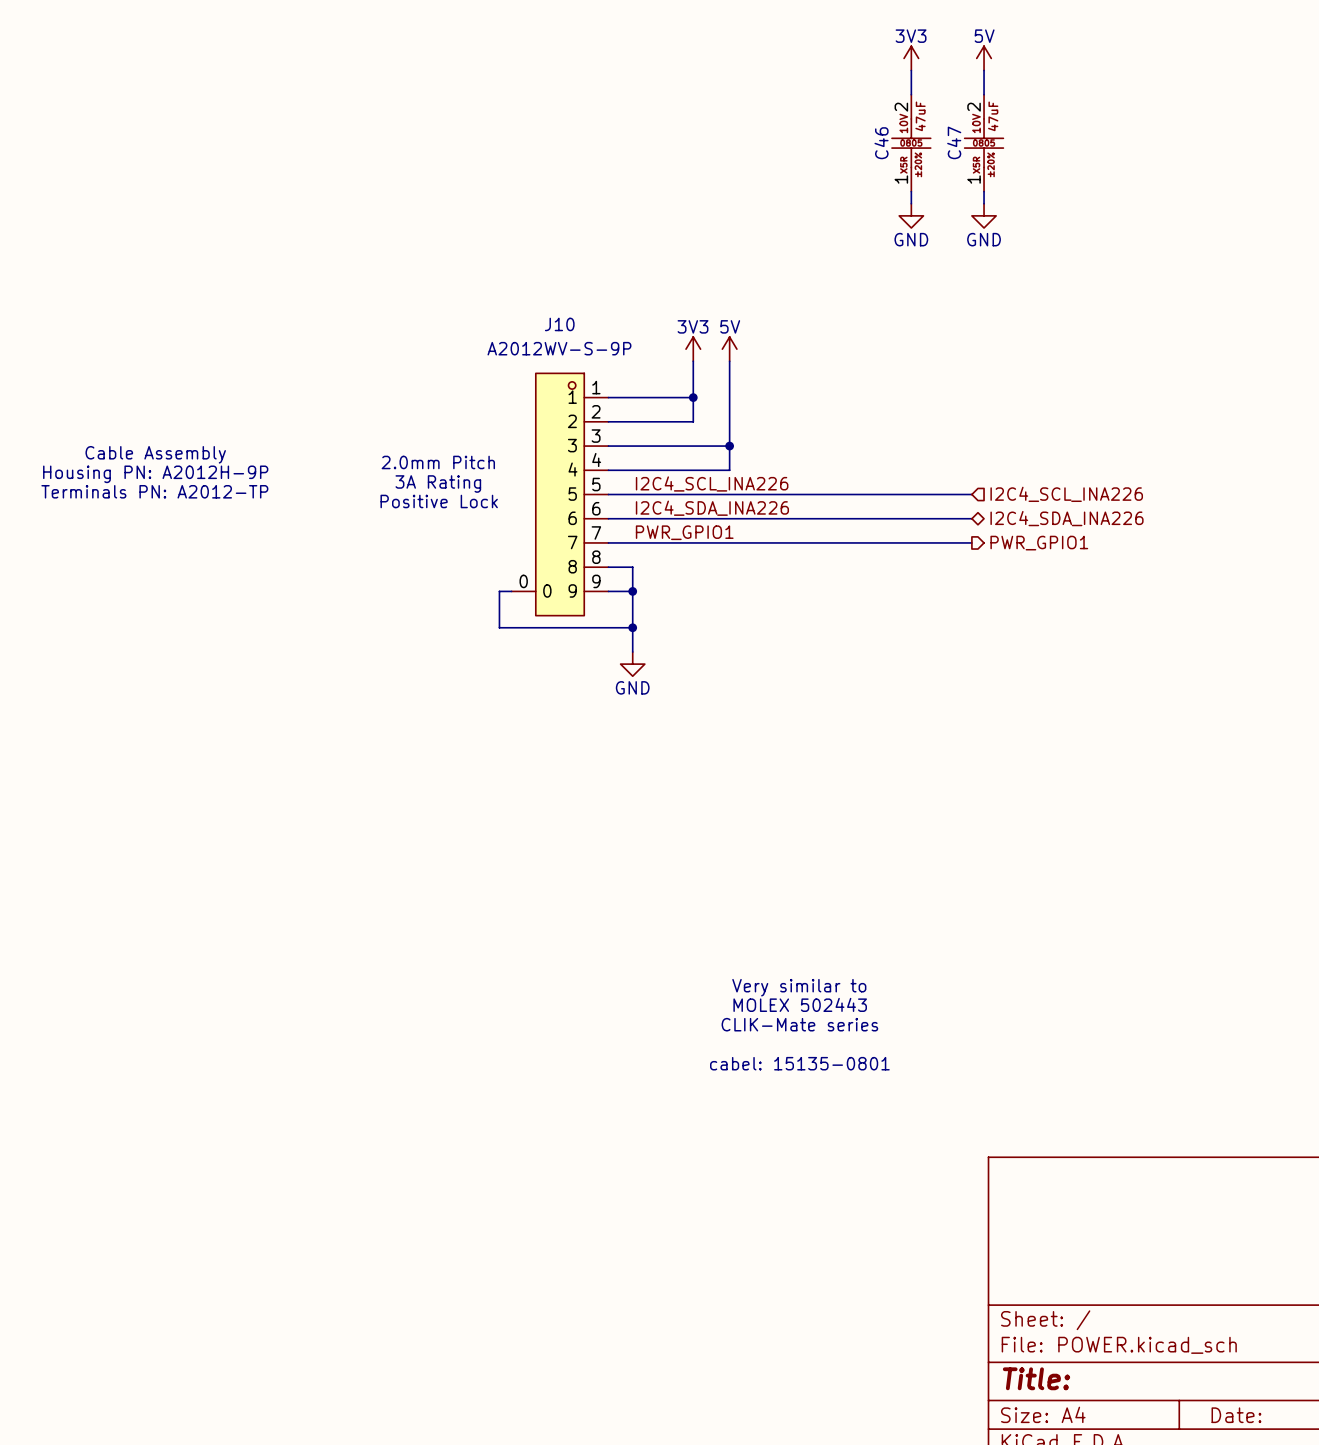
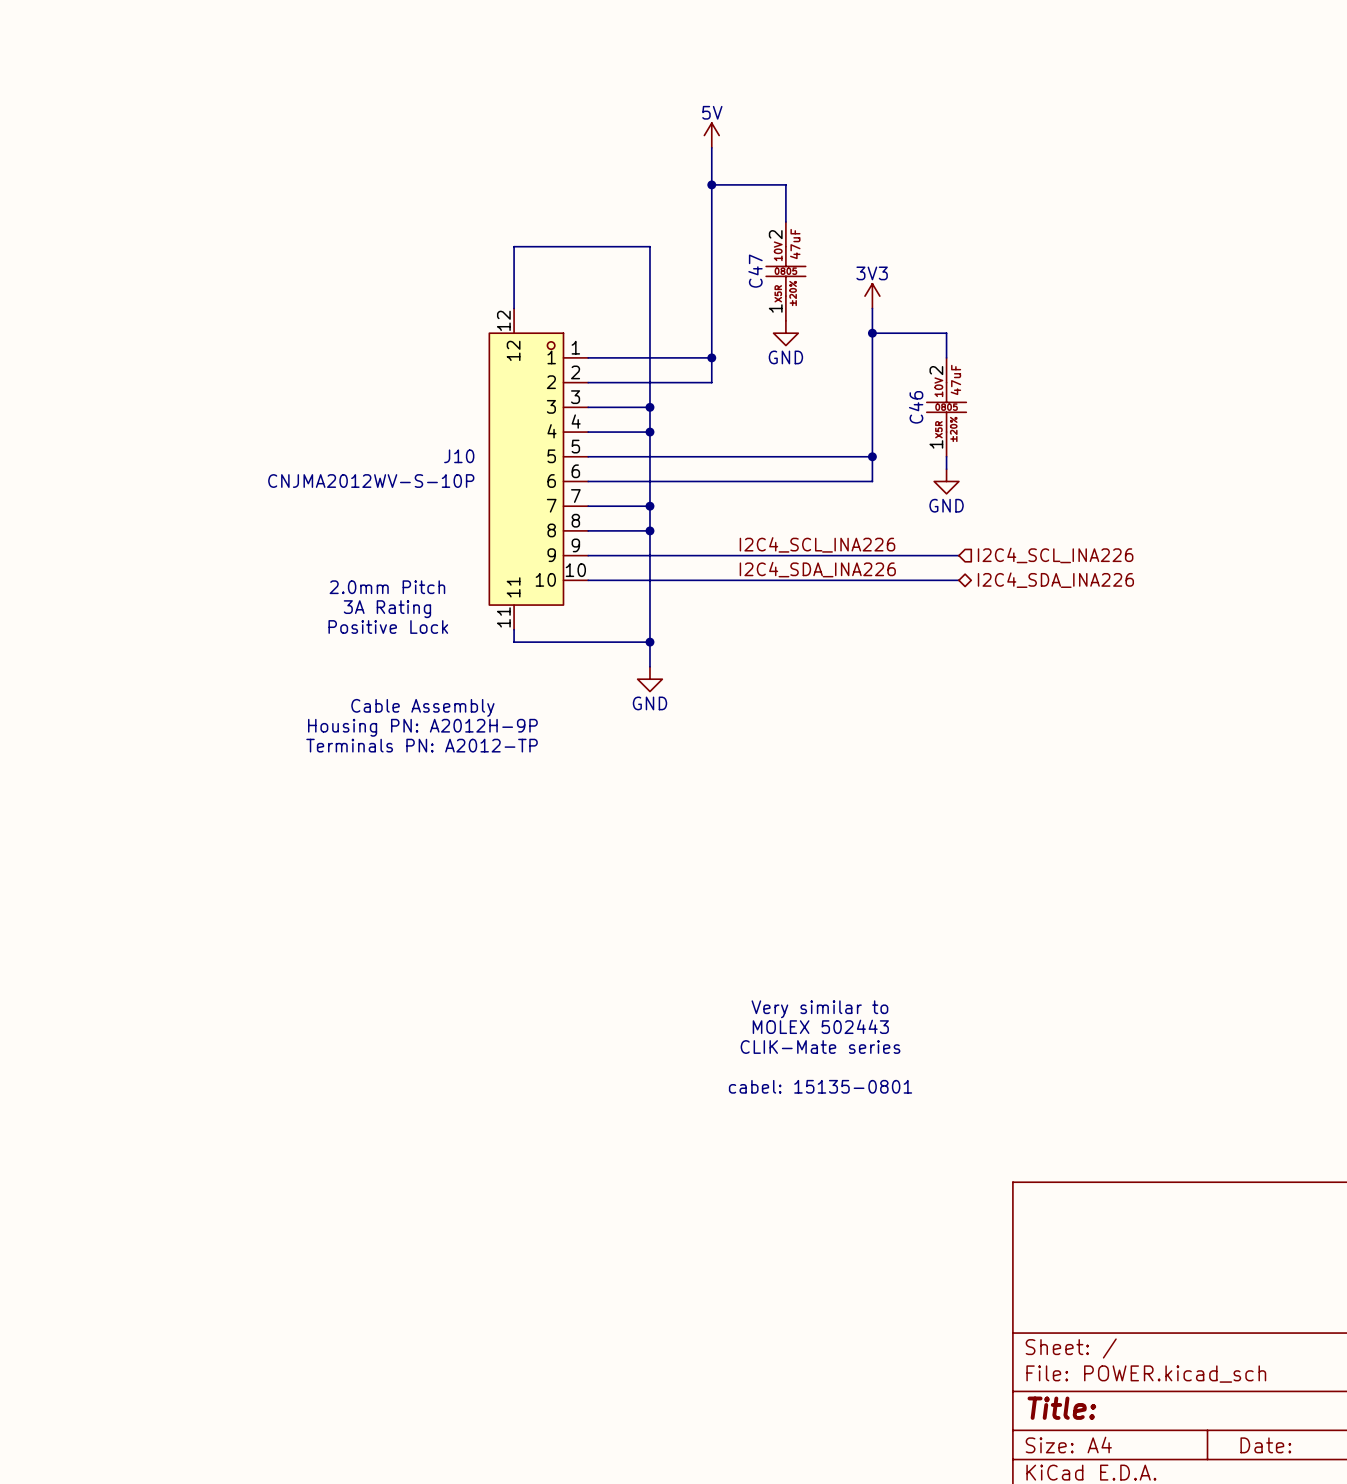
power symbol: 3V3 (911, 58) -> none
power symbol: 5V (984, 58) -> none
wire: (911, 70) (911, 94) -> none
wire: (984, 70) (984, 94) -> none
power symbol: none -> 5V (711, 135)
wire: none -> (711, 147) (711, 370)
C46 position: (911, 143) -> (946, 407)
C47 position: (984, 143) -> (785, 271)
wire: none -> (711, 184) (785, 184) (785, 221)
junction: none -> (711, 184)
wire: (911, 191) (911, 203) -> none
wire: (984, 191) (984, 203) -> none
power symbol: GND (911, 215) -> none
power symbol: GND (984, 215) -> none
power symbol: none -> 3V3 (872, 296)
wire: none -> (514, 308) (514, 246) (649, 246) (649, 580) (958, 580)
J10 name position: J10 (559, 324) -> J10 (459, 456)
power symbol: none -> GND (785, 333)
wire: none -> (872, 333) (946, 333) (946, 357)
junction: none -> (872, 333)
J10 value: A2012WV-S-9P (559, 348) -> CNJMA2012WV-S-10P (371, 481)
wire: none -> (588, 357) (711, 357)
junction: none -> (711, 357)
power symbol: 3V3 (693, 349) -> none
power symbol: 5V (729, 349) -> none
wire: (729, 361) (729, 470) -> (872, 308) (872, 481) (748, 481)
J10 symbol: [511, 373, 609, 616] -> [489, 308, 589, 630]
wire: (693, 373) (693, 421) (632, 421) -> (711, 382) (588, 382)
wire: (632, 397) (693, 397) -> none
junction: none -> (649, 407)
junction: (693, 397) -> none
junction: none -> (649, 432)
wire: none -> (748, 456) (872, 456)
junction: (729, 446) -> none
junction: none -> (872, 456)
wire: none -> (946, 456) (946, 469)
text: Cable Assembly (155, 454) -> none
text position: 2.0mm Pitch (438, 462) -> 2.0mm Pitch (387, 587)
power symbol: none -> GND (946, 481)
text: Housing PN: A2012H-9P (155, 474) -> none
label position: I2C4_SCL_INA226 (712, 483) -> I2C4_SCL_INA226 (817, 544)
text position: 3A Rating (438, 484) -> 3A Rating (387, 609)
text: Terminals PN: A2012-TP (154, 491) -> none
wire: (632, 494) (971, 494) -> none
junction: none -> (649, 506)
hierarchical label position: I2C4_SCL_INA226 (1066, 494) -> I2C4_SCL_INA226 (1055, 555)
text position: Positive Lock (439, 501) -> Positive Lock (388, 626)
label position: I2C4_SDA_INA226 (712, 508) -> I2C4_SDA_INA226 (817, 569)
wire: (632, 518) (971, 518) -> none
junction: none -> (649, 530)
hierarchical label position: I2C4_SDA_INA226 (1066, 518) -> I2C4_SDA_INA226 (1055, 580)
label: PWR_GPIO1 (684, 532) -> none
wire: (935, 542) (971, 542) -> none
hierarchical label: PWR_GPIO1 (1039, 543) -> none
wire: (608, 591) (632, 591) -> none
junction: (632, 591) -> none
text: none -> Cable Assembly (422, 707)
text: none -> Housing PN: A2012H-9P (422, 727)
text: none -> Terminals PN: A2012-TP (422, 745)

